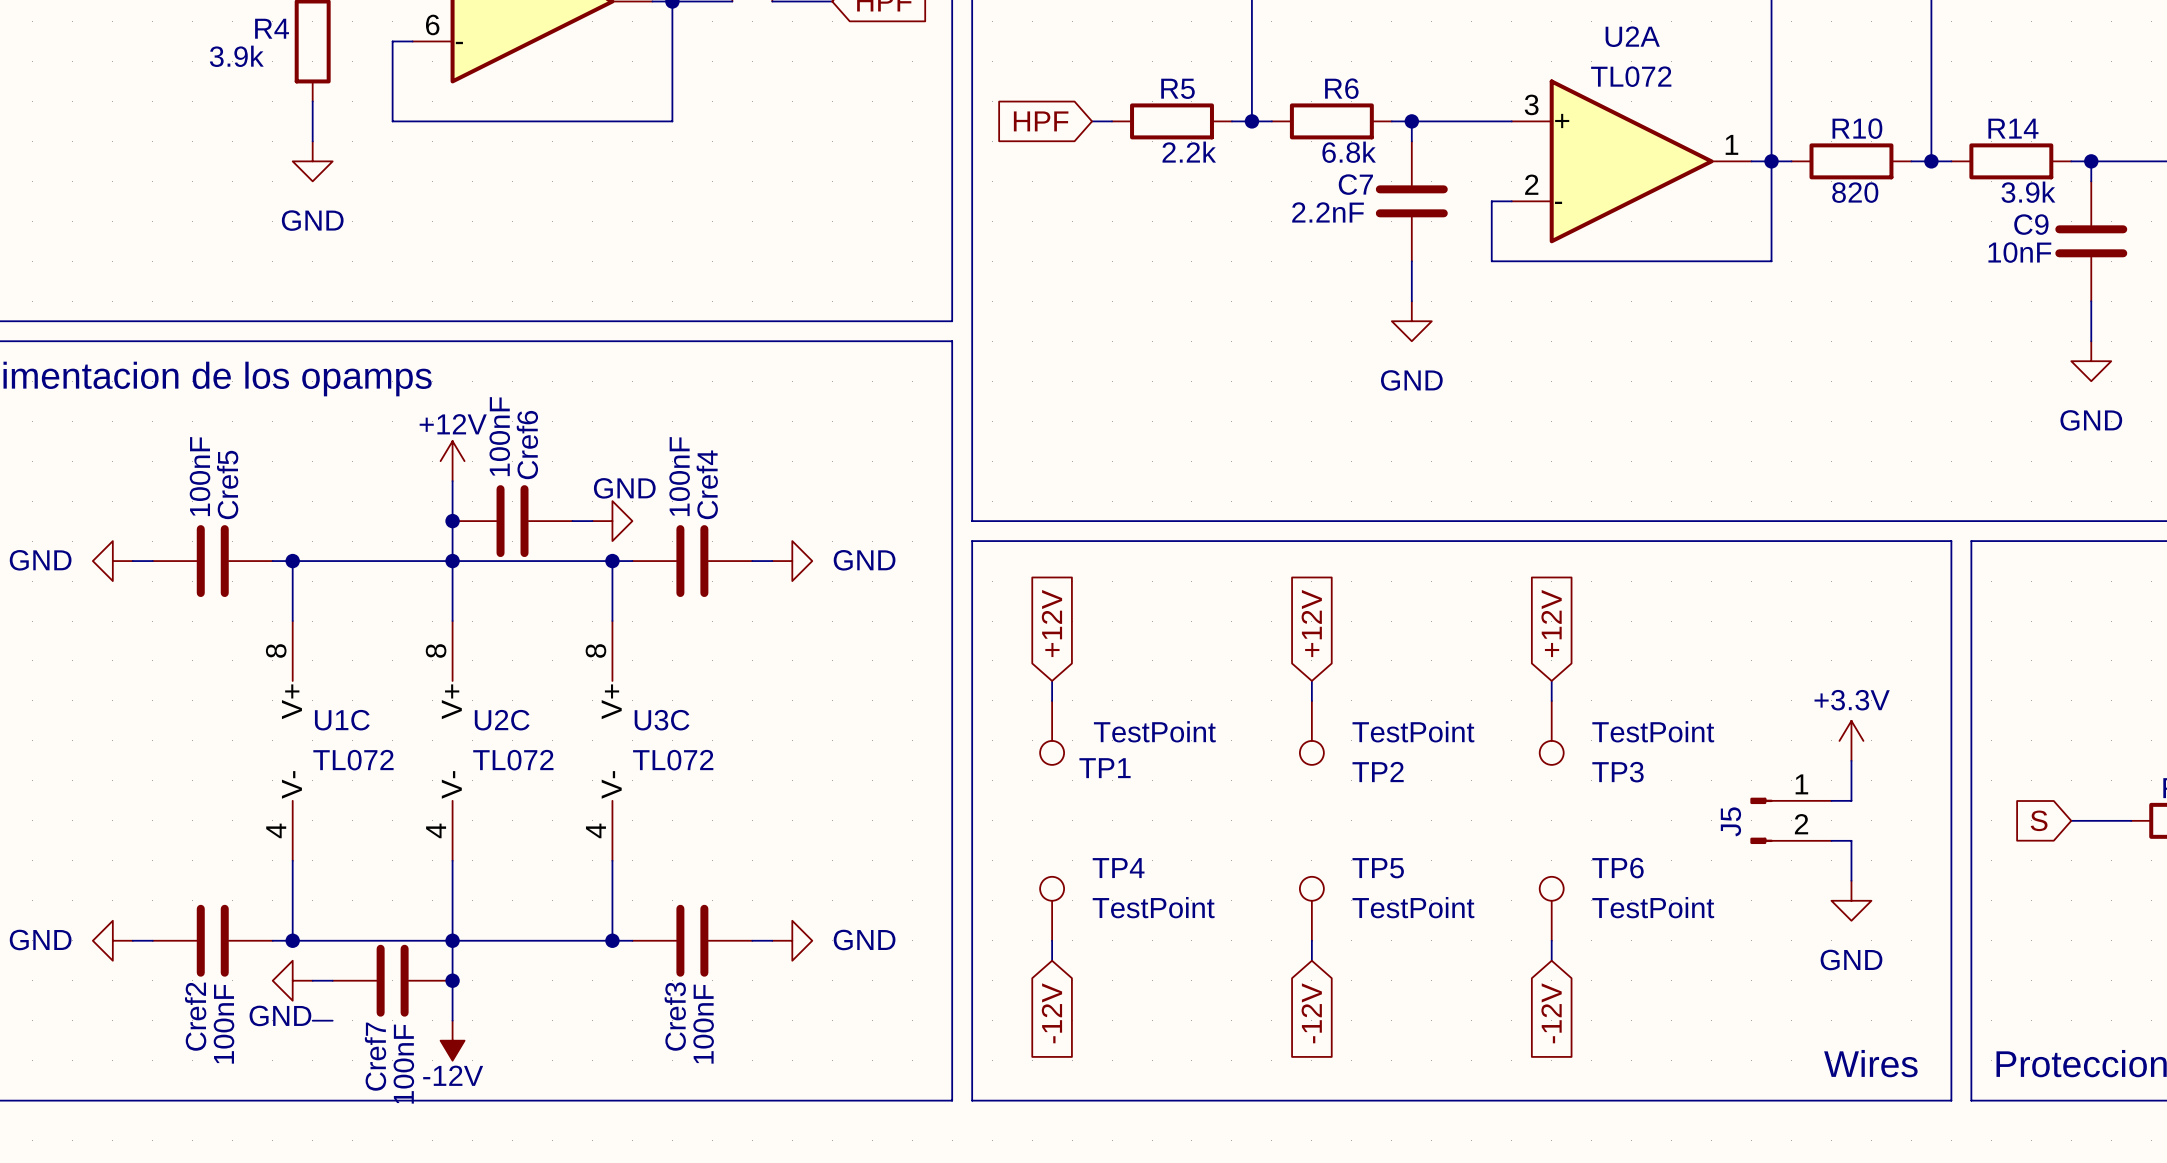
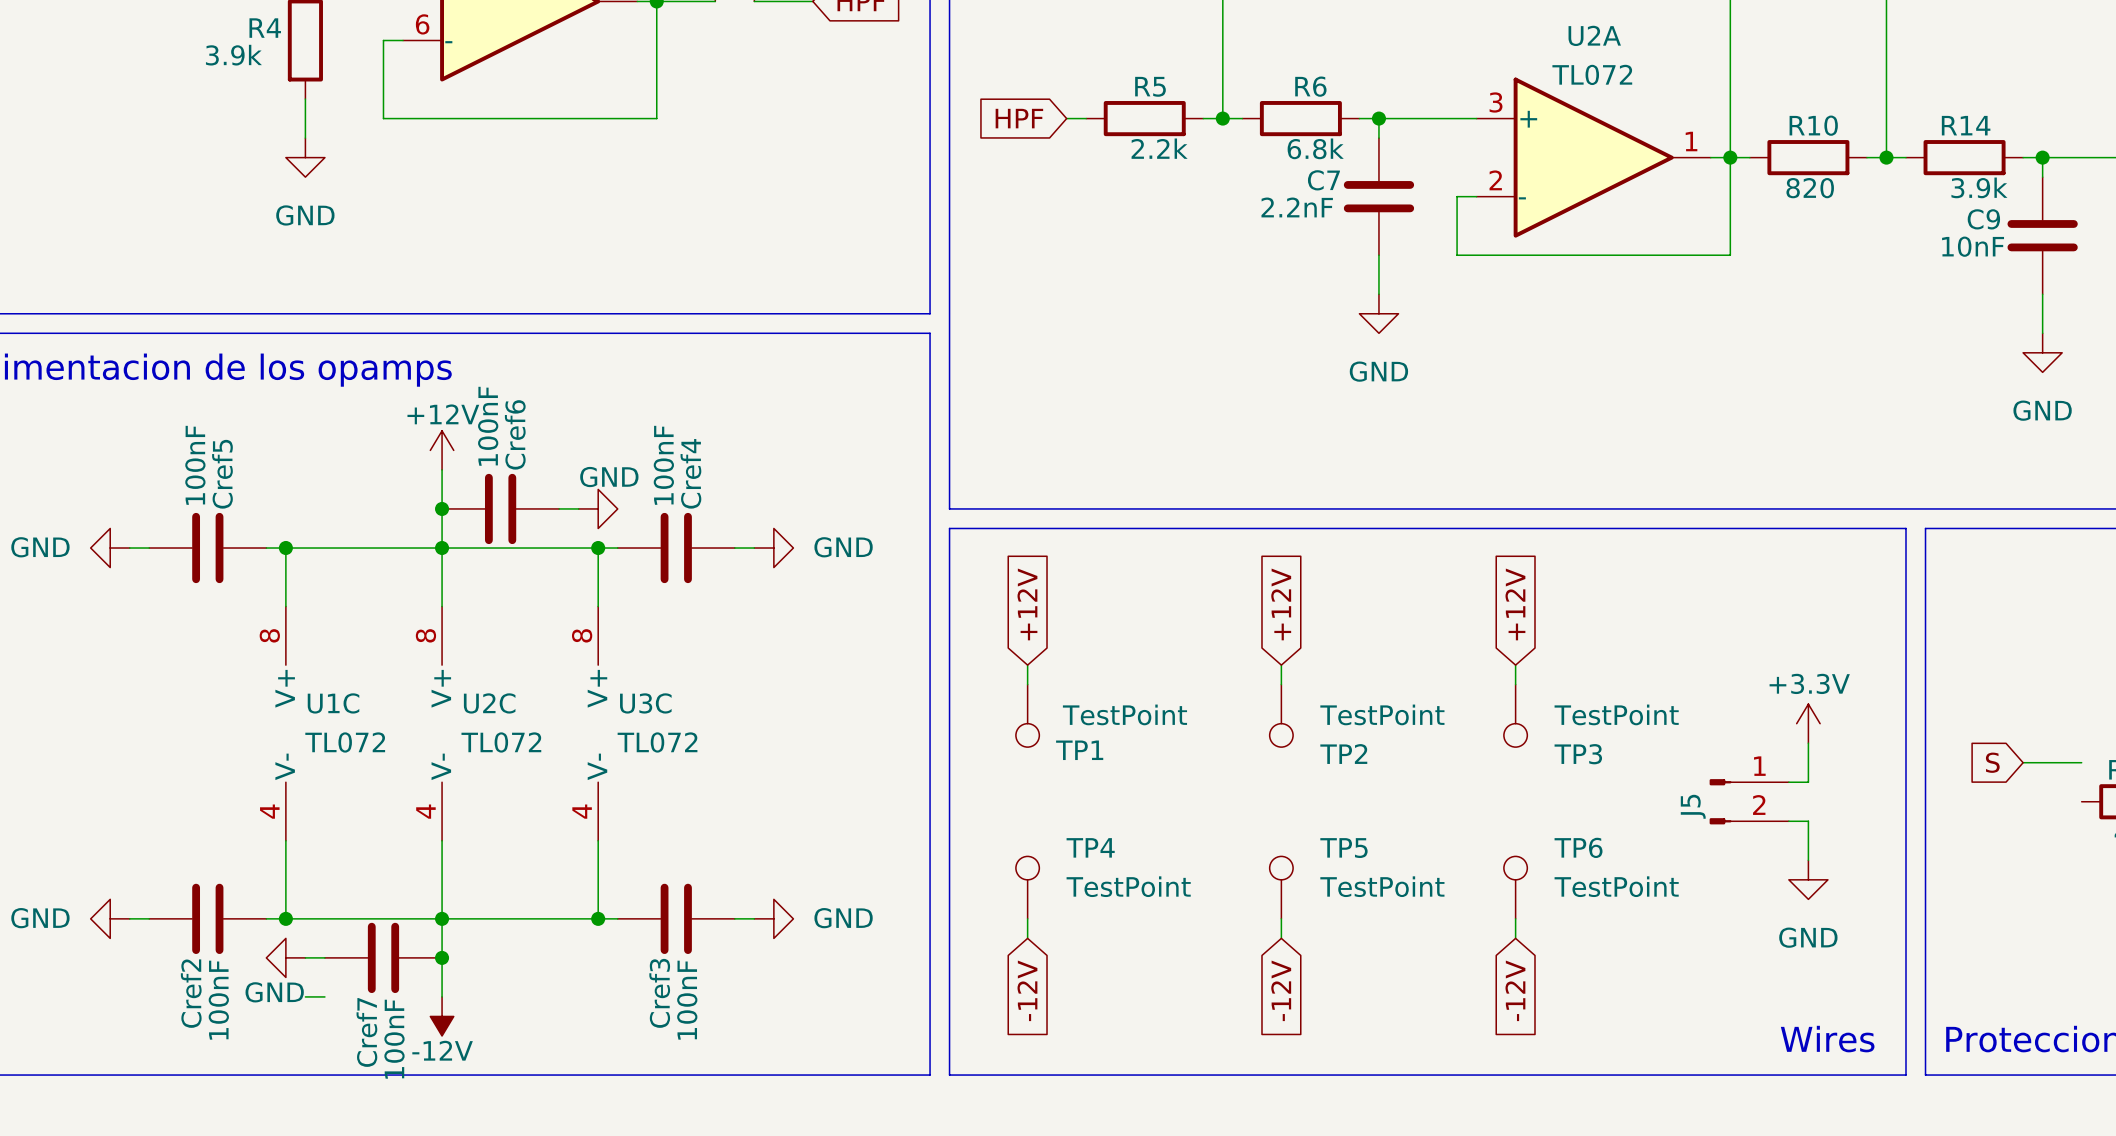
global label position: S (2039, 820) -> S (1992, 762)
wire: (2071, 820) (2131, 820) -> (2023, 762) (2081, 762)

